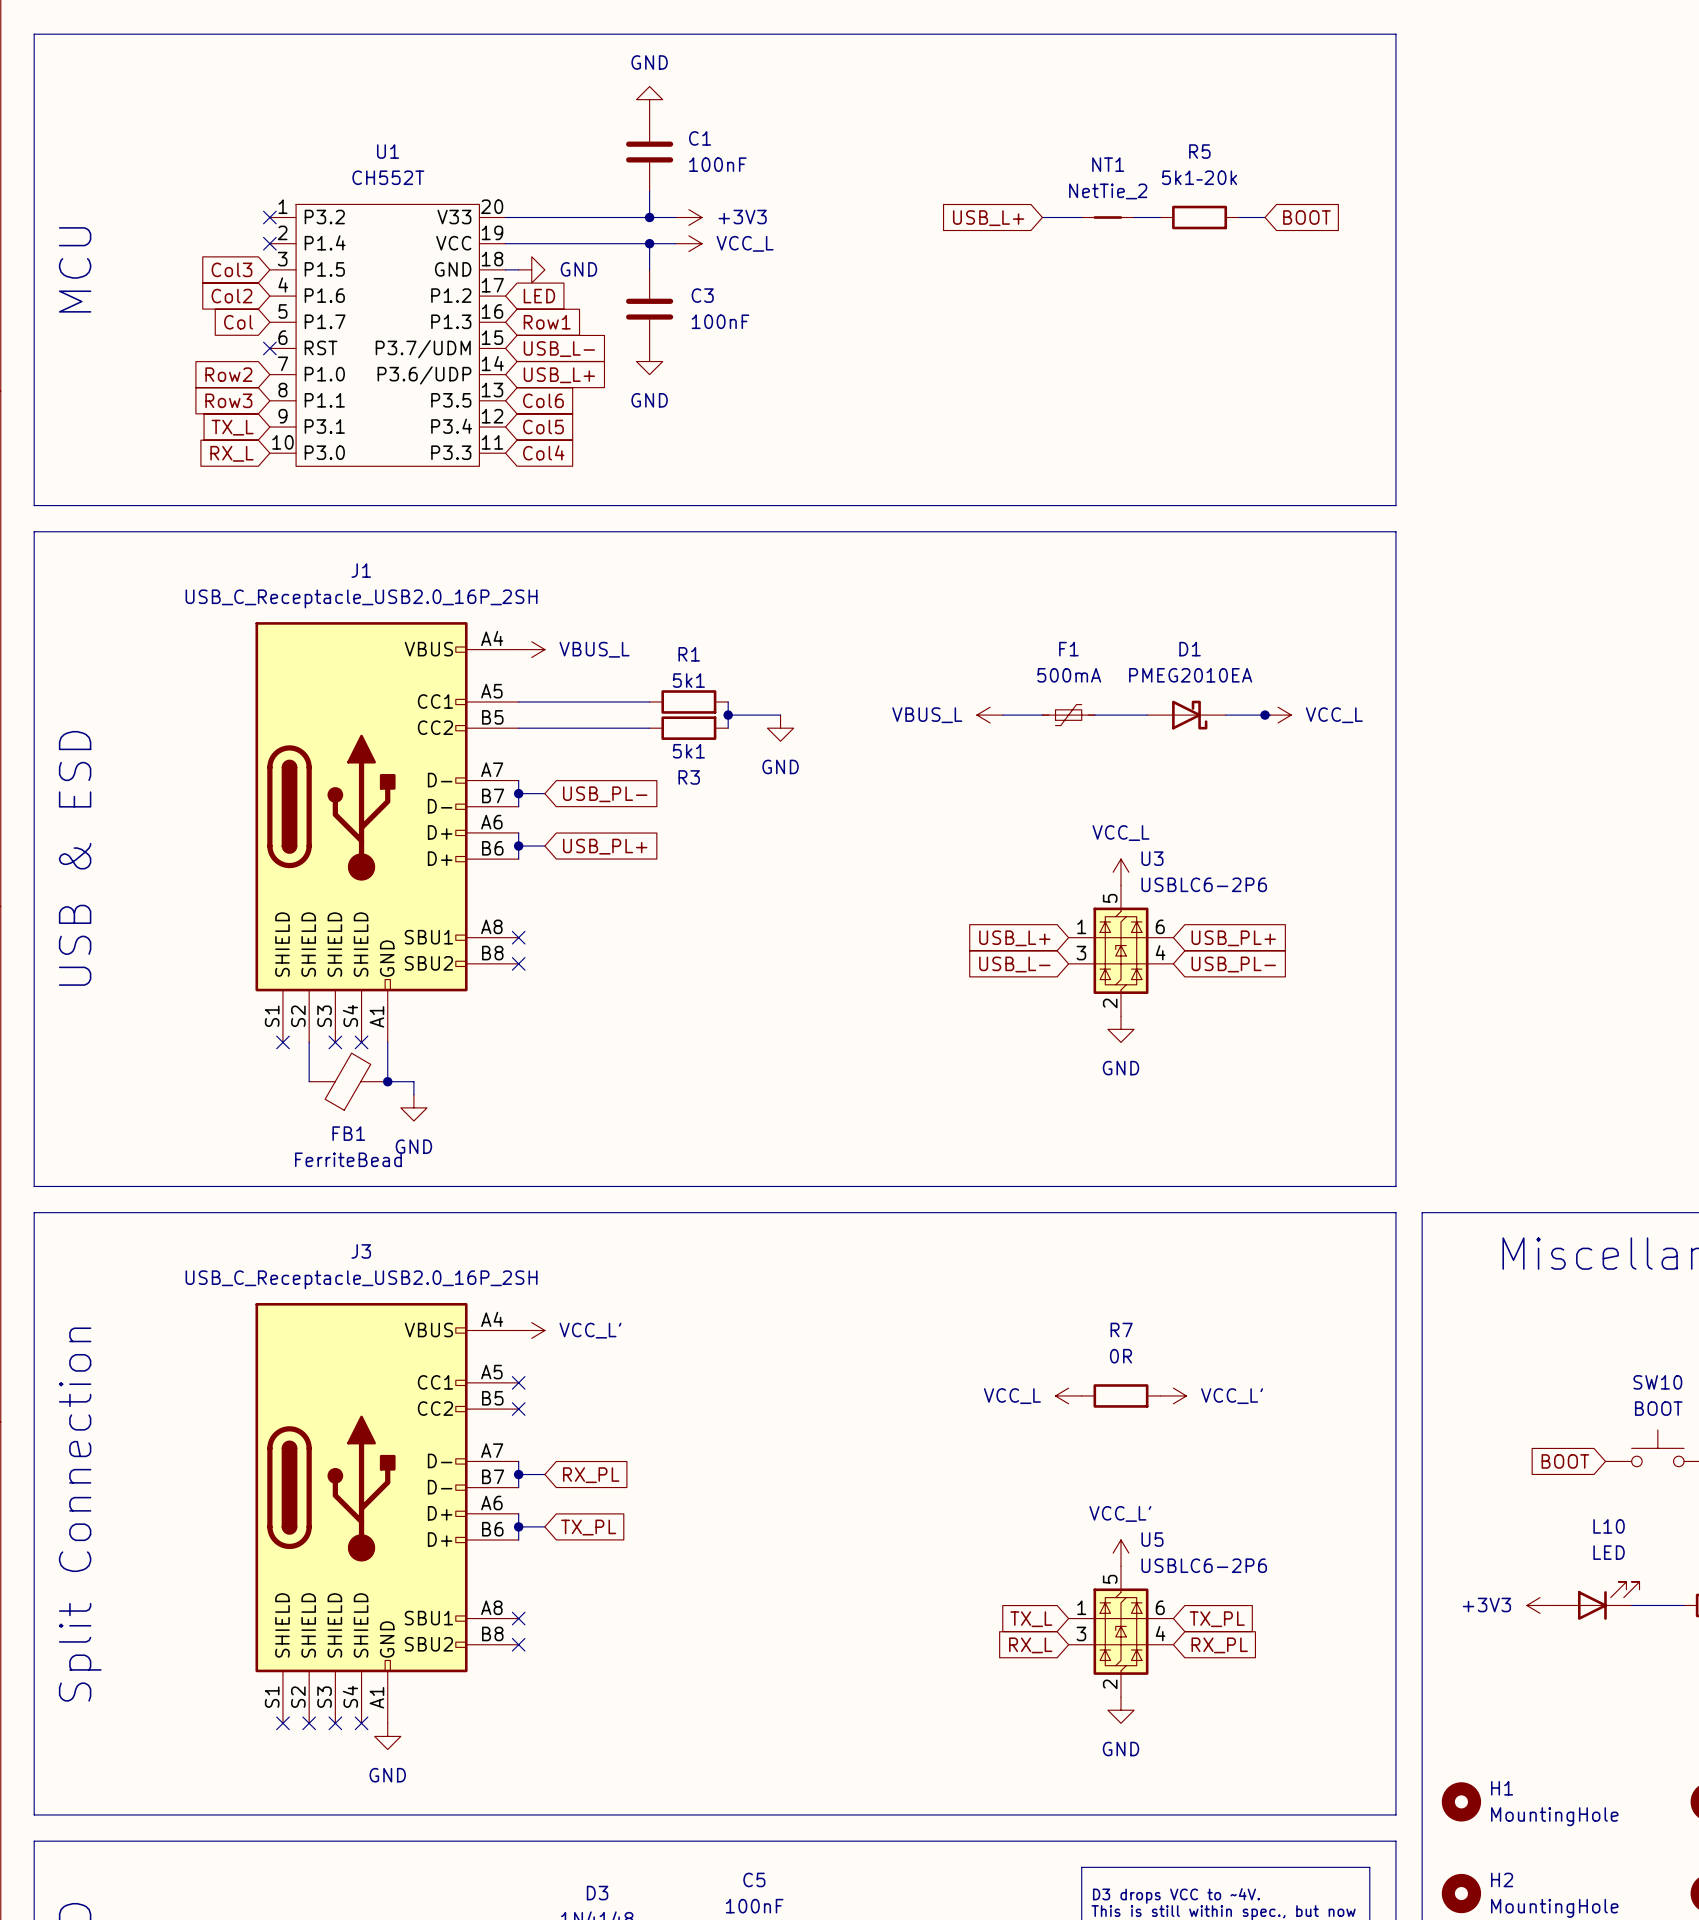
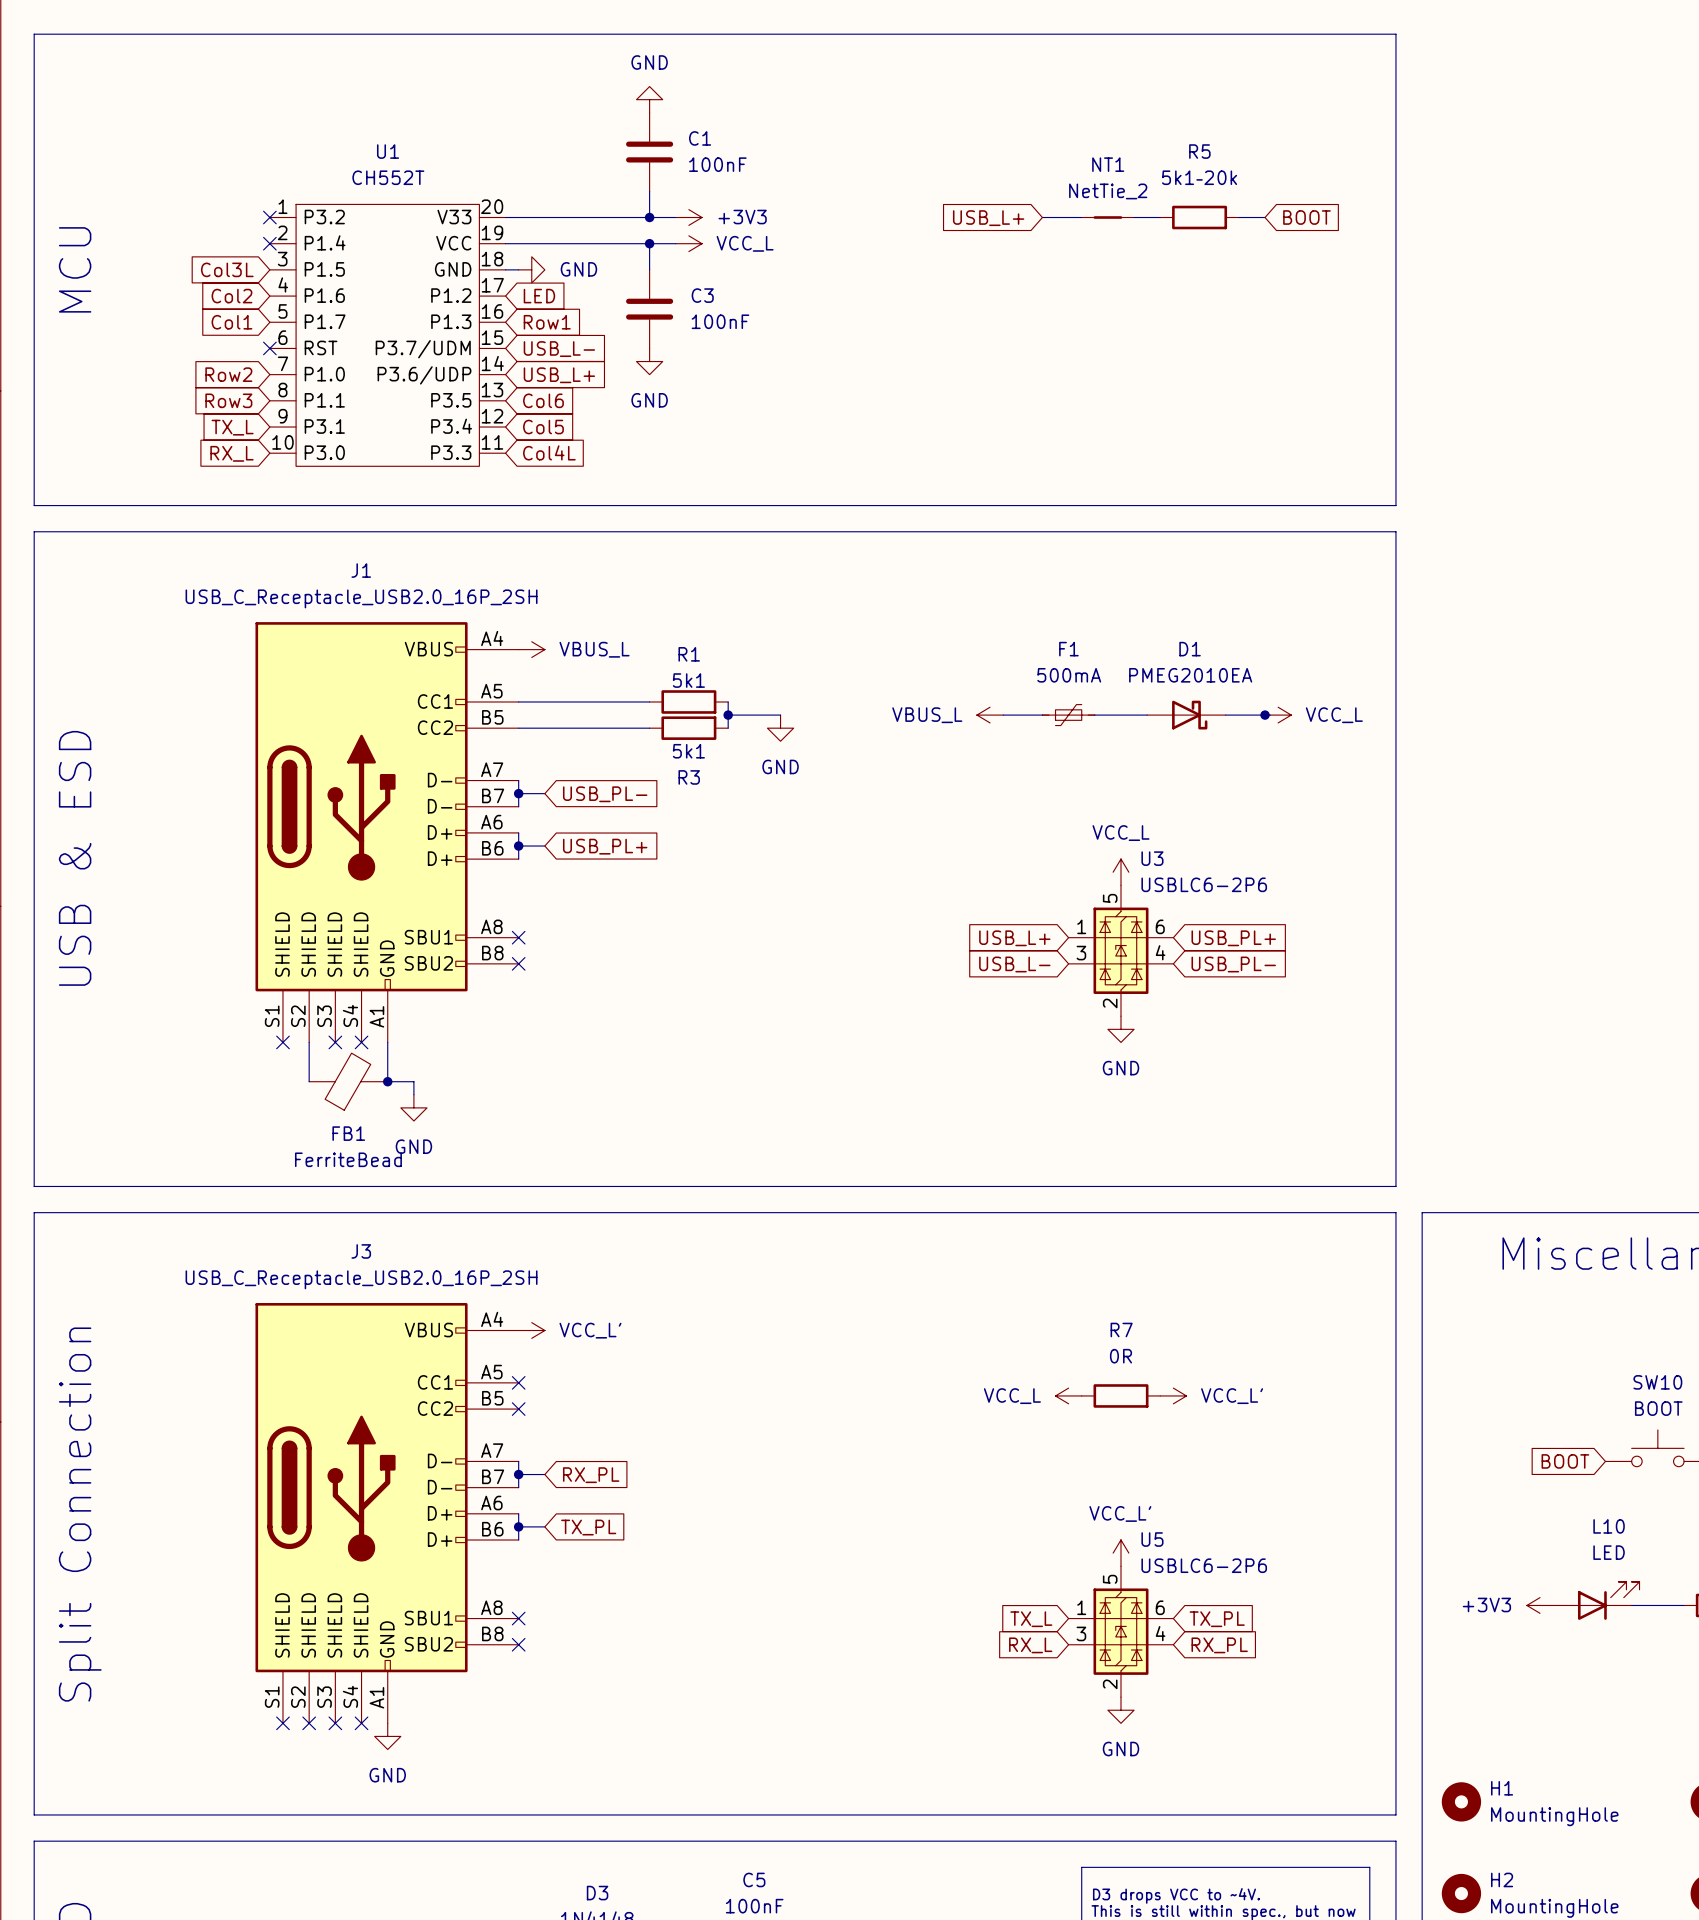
global label: Col3 (231, 269) -> Col3L (227, 269)
global label: Col (238, 322) -> Col1 (231, 322)
global label: Col4 (543, 452) -> Col4L (549, 452)

